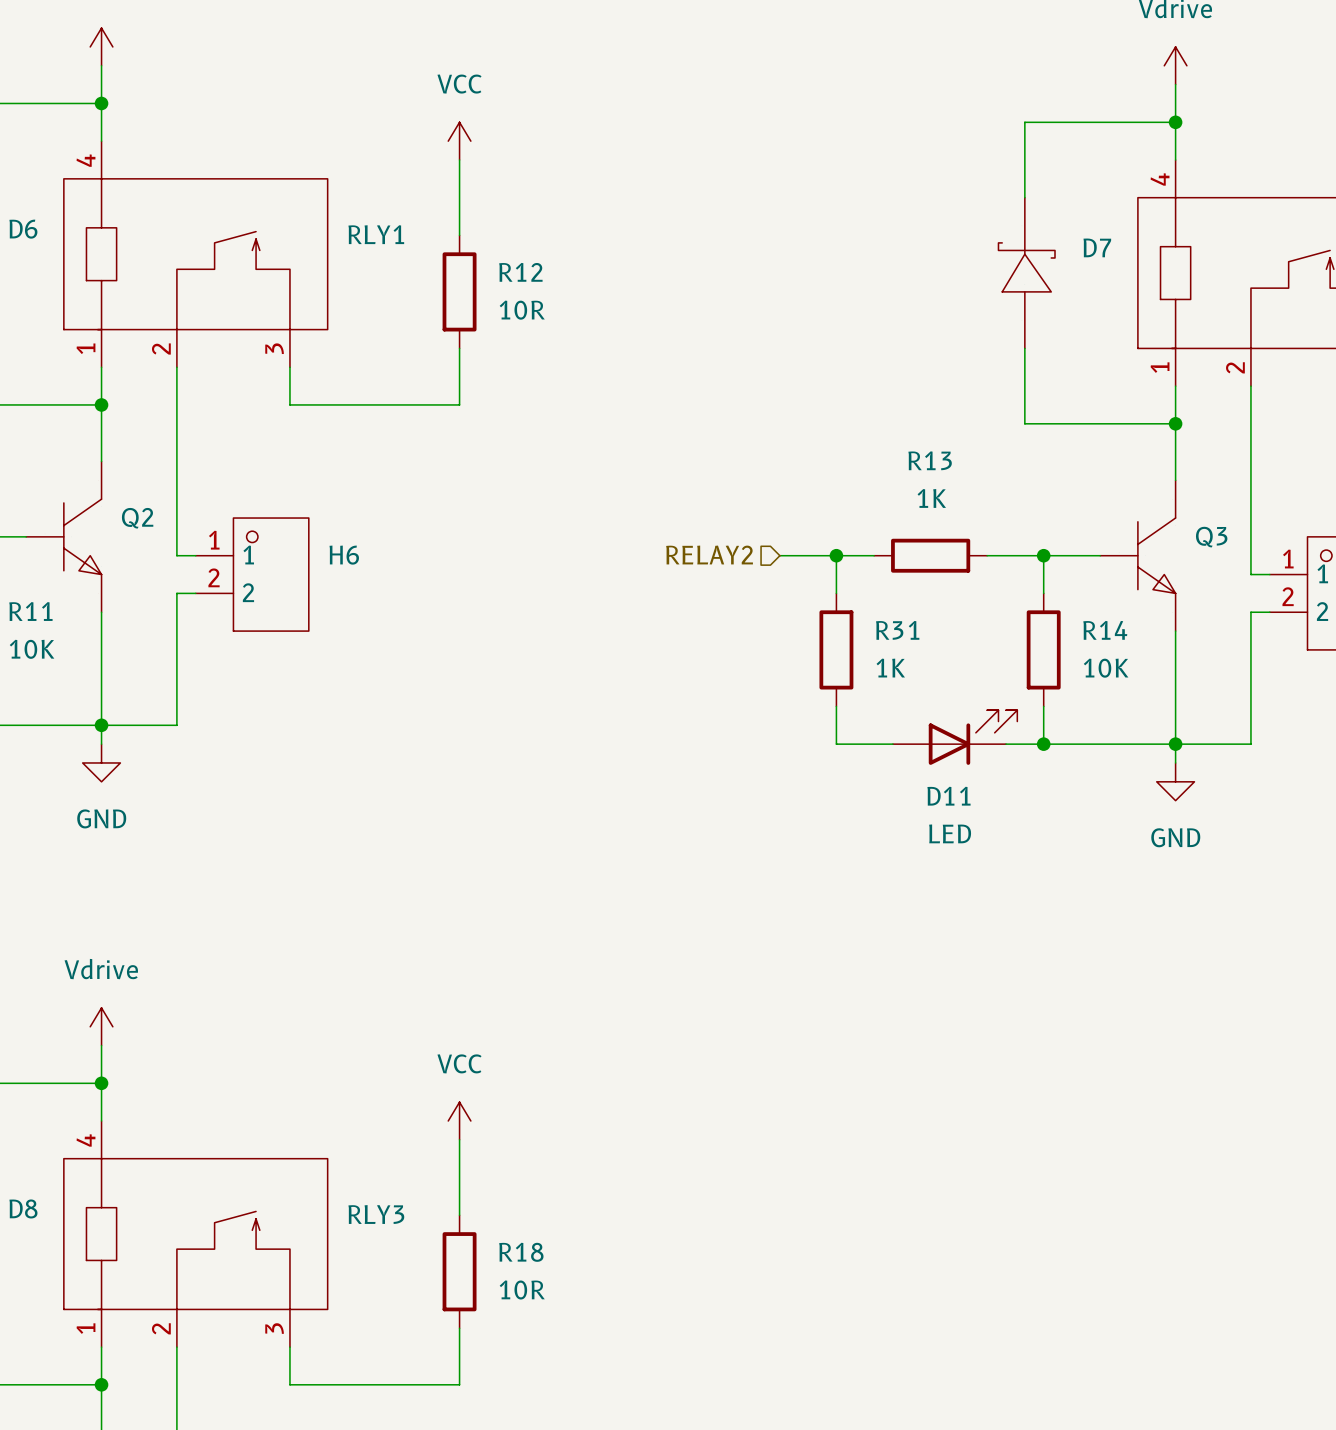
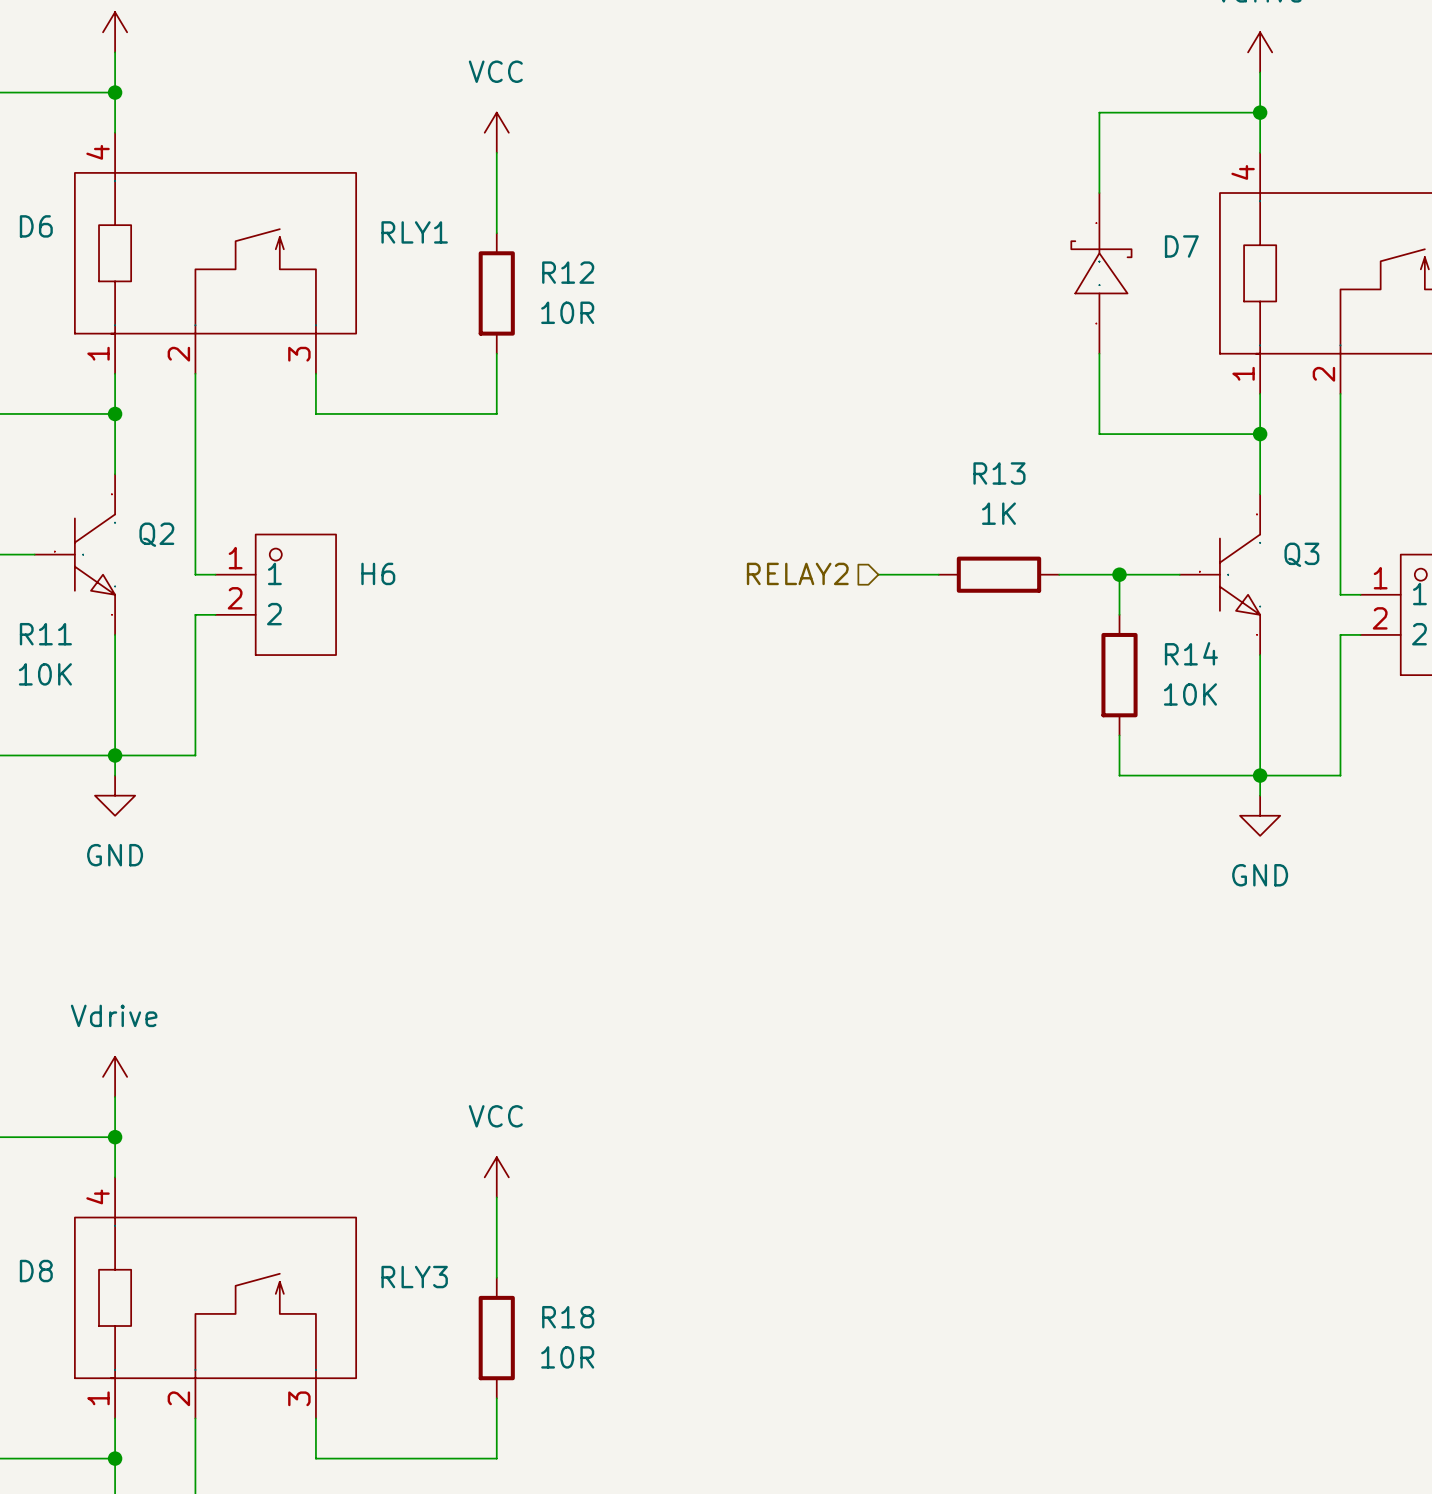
hierarchical label position: RELAY2 (709, 555) -> RELAY2 (797, 573)
wire: (779, 555) (817, 555) -> none
wire: (836, 555) (836, 593) -> none
junction: (836, 555) -> none
R31: 1K (836, 649) -> none
wire: (836, 706) (836, 744) (892, 744) -> none
D11: LED (955, 737) -> none
wire: (1006, 744) (1043, 744) -> none
junction: (1043, 744) -> none

